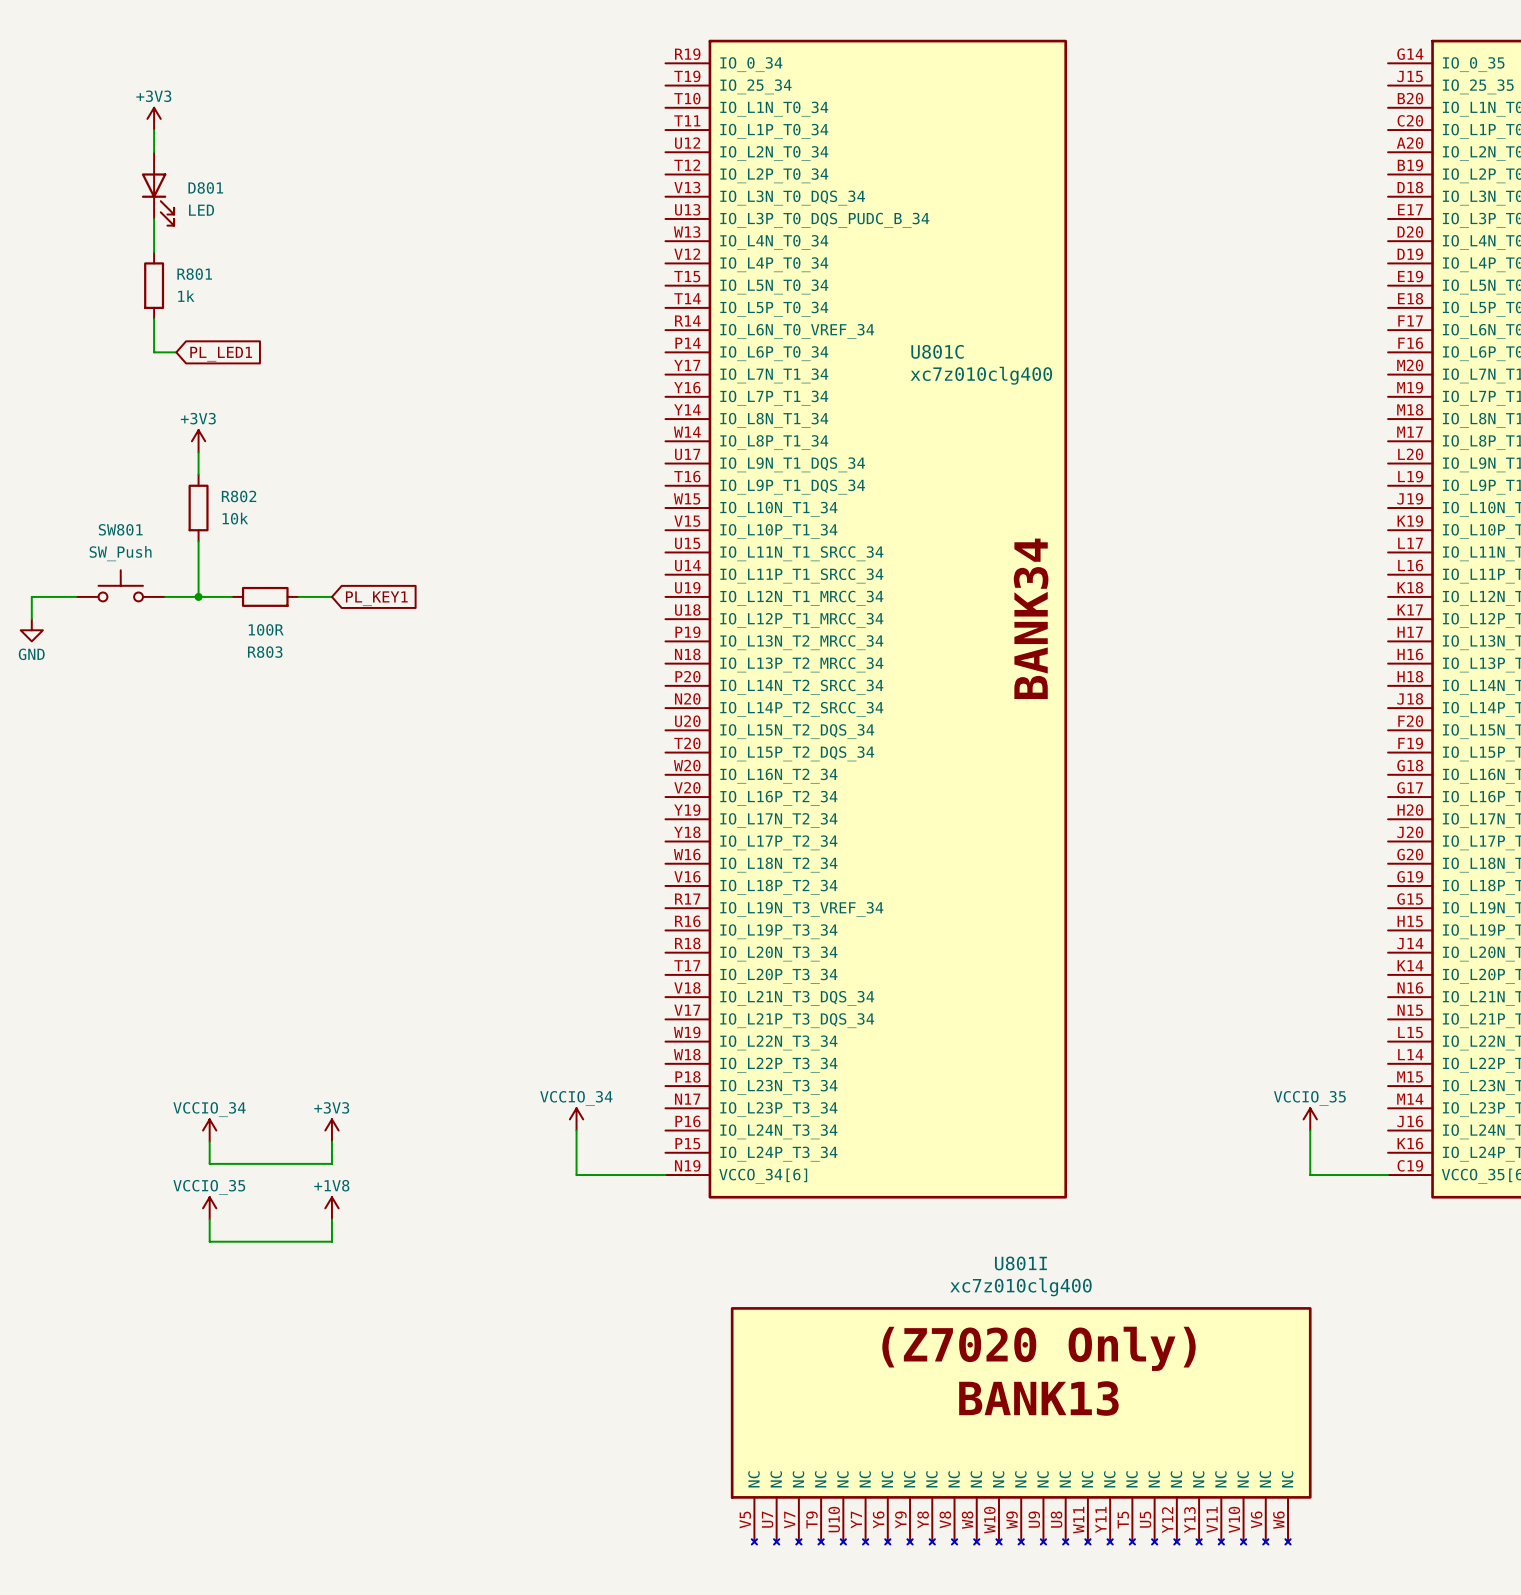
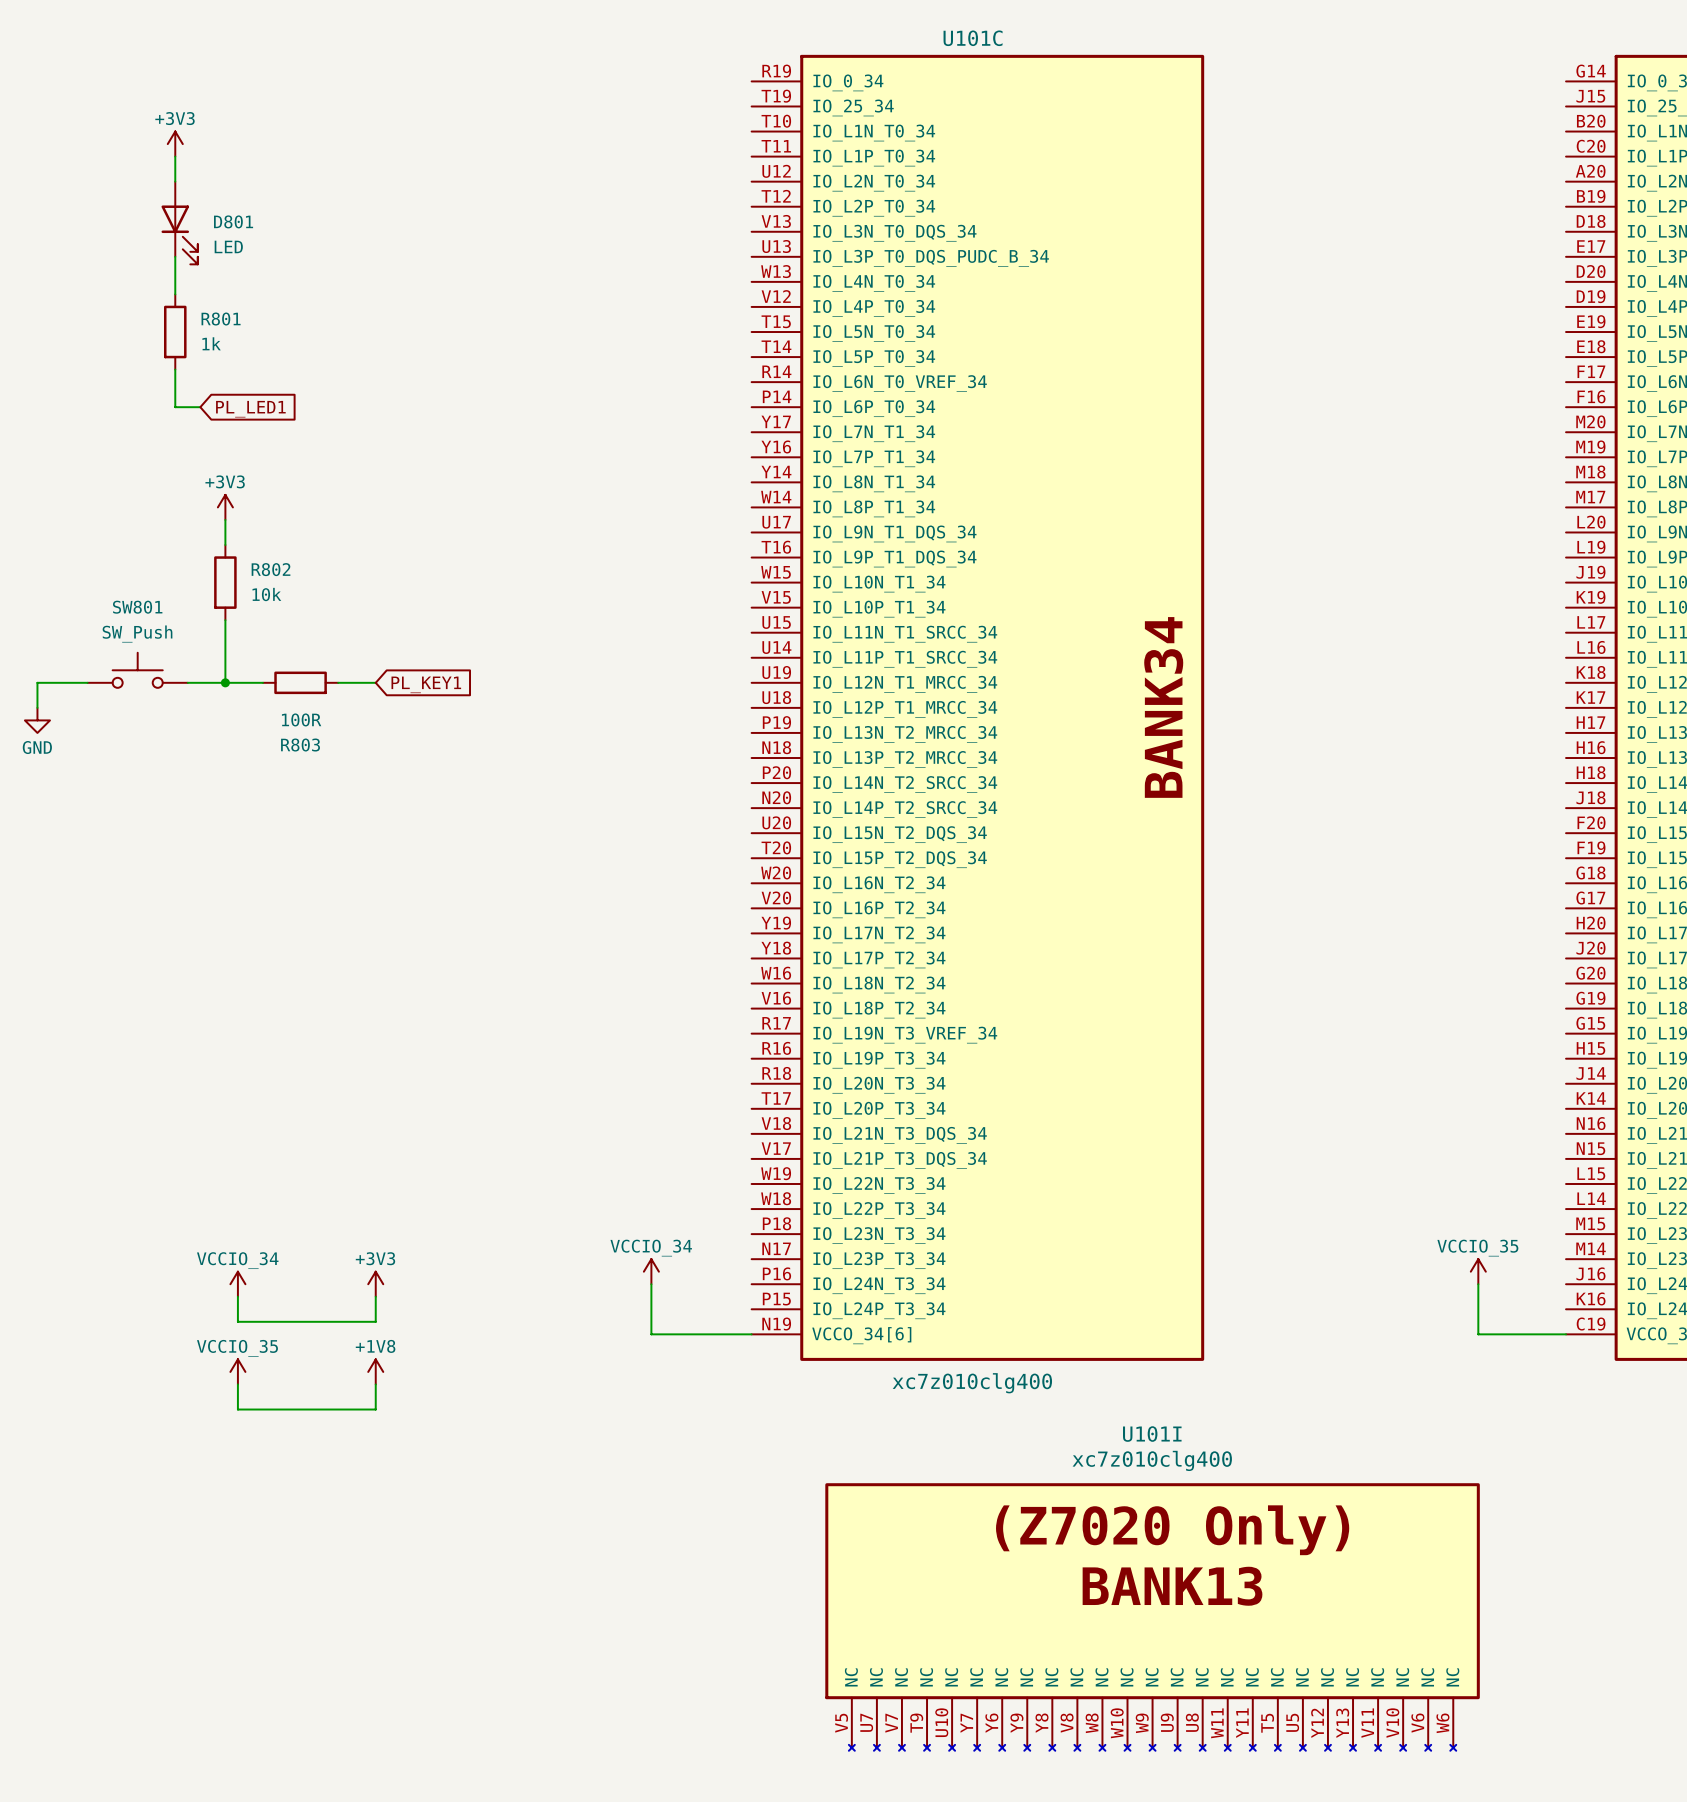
U801C name: U801C (937, 351) -> U101C (973, 38)
U801C value position: xc7z010clg400 (981, 375) -> xc7z010clg400 (972, 1383)
U801I name: U801I (1020, 1263) -> U101I (1152, 1434)

